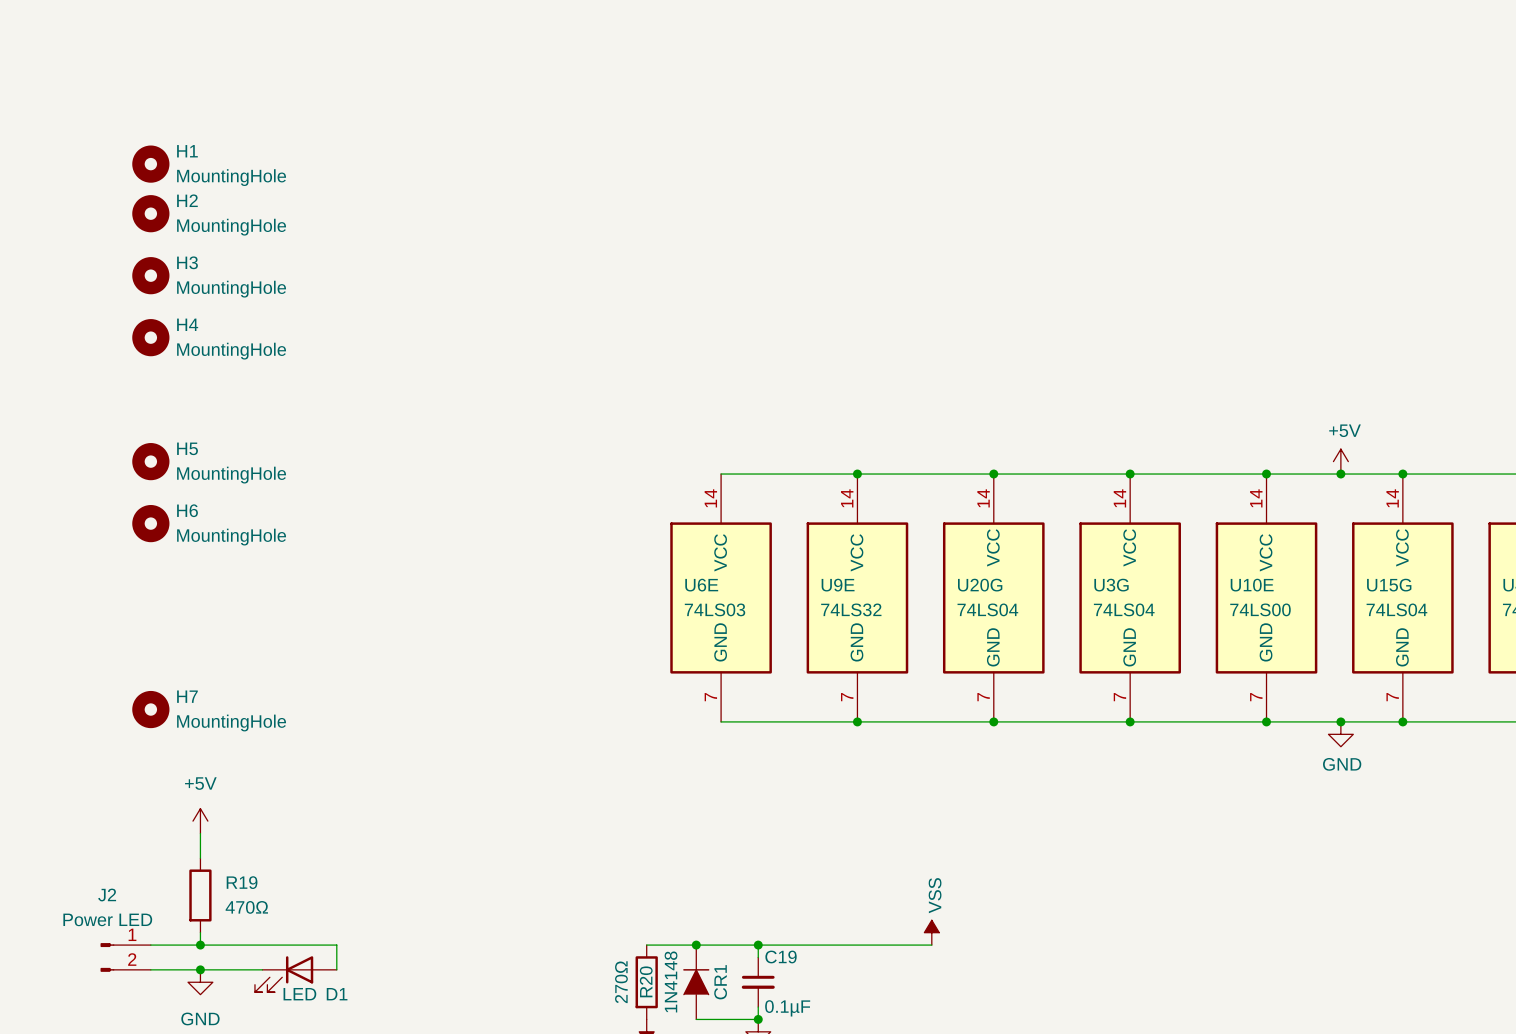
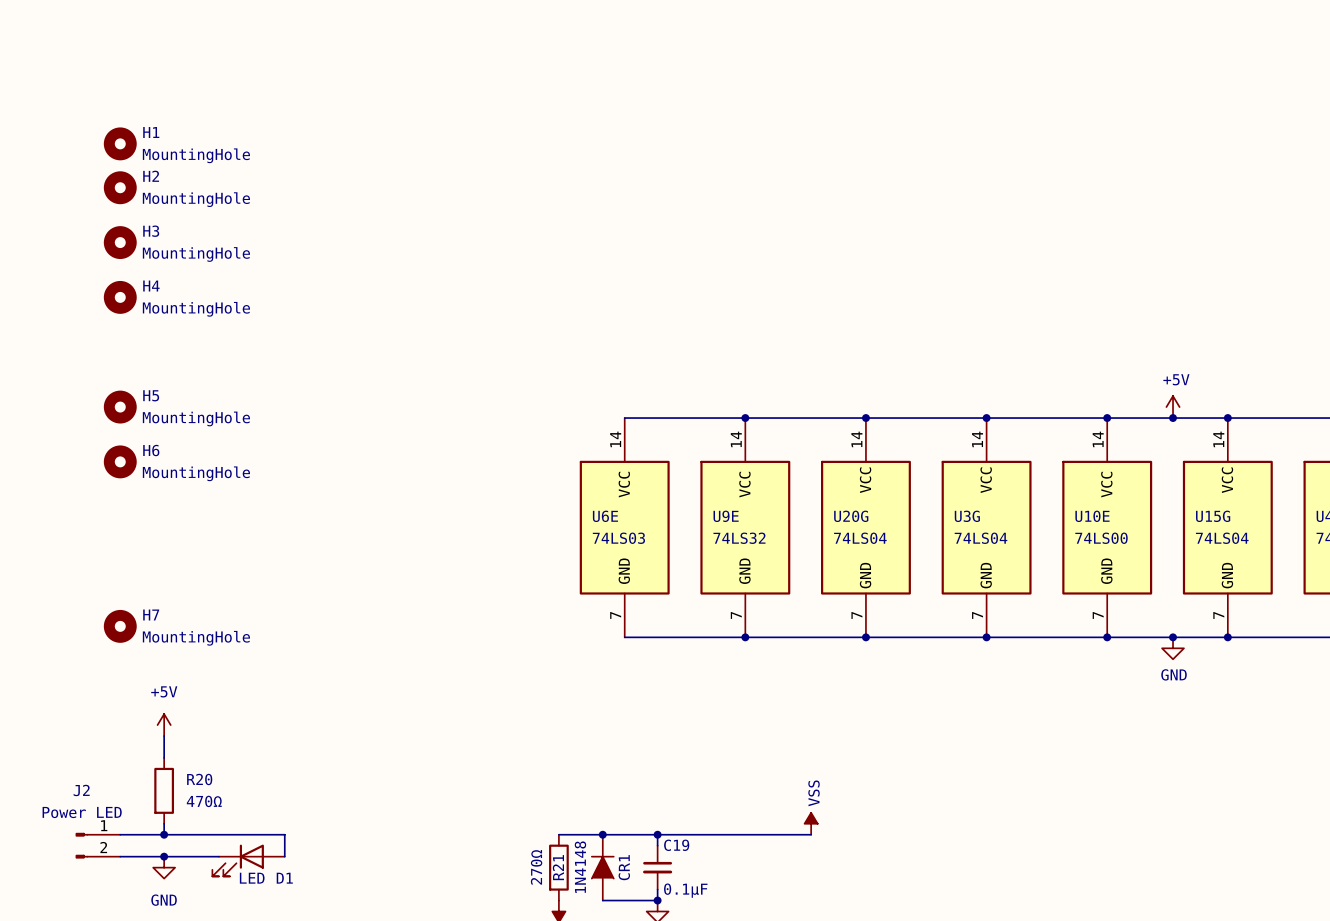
R19 name: R19 (242, 882) -> R20 (199, 779)
R20 name: R20 (646, 981) -> R21 (558, 867)

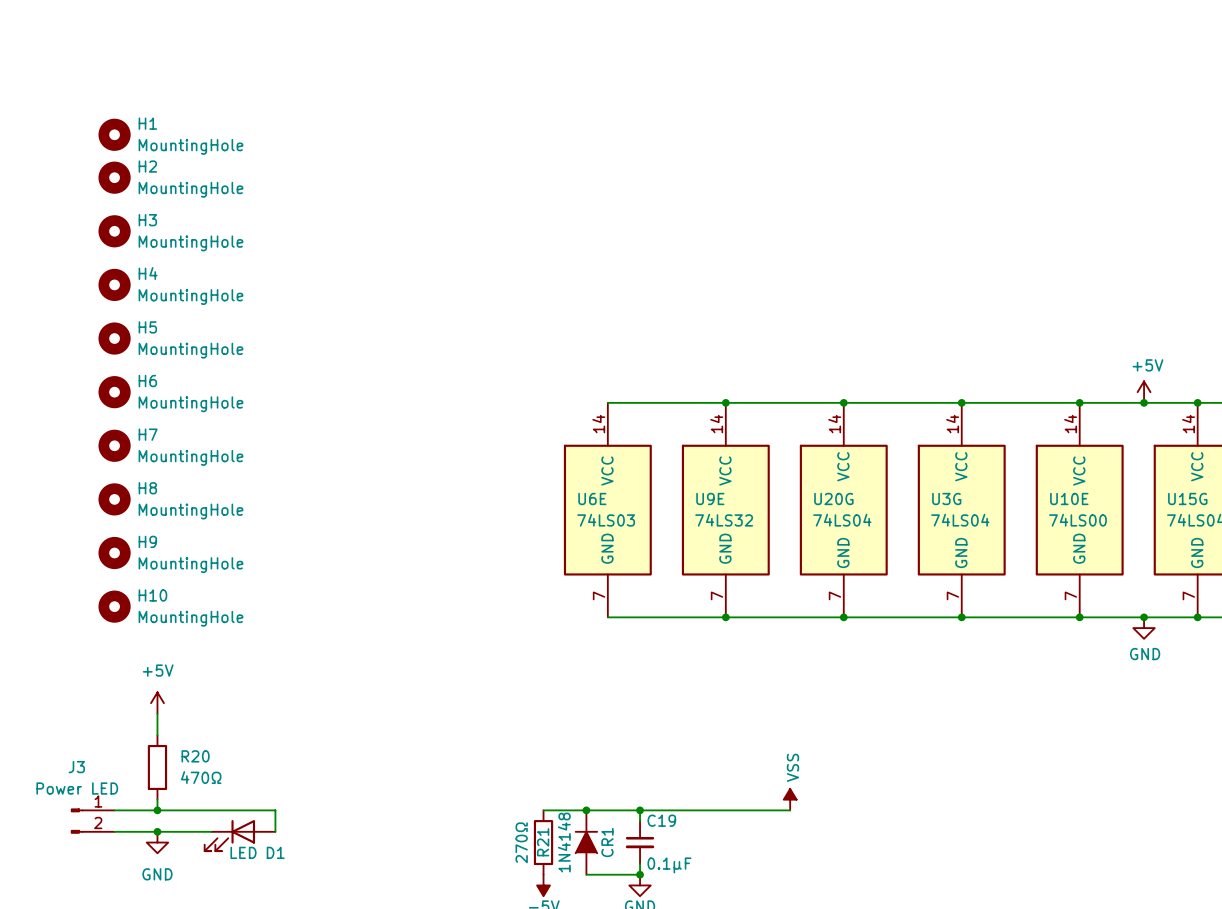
H5: none -> MountingHole (114, 338)
H5 name: H5 (151, 395) -> H6 (147, 381)
H6 name: H6 (151, 450) -> H7 (148, 434)
H8: none -> MountingHole (114, 499)
H9: none -> MountingHole (114, 553)
H7 name: H7 (151, 615) -> H10 (152, 595)
J2 name: J2 (81, 790) -> J3 (76, 767)

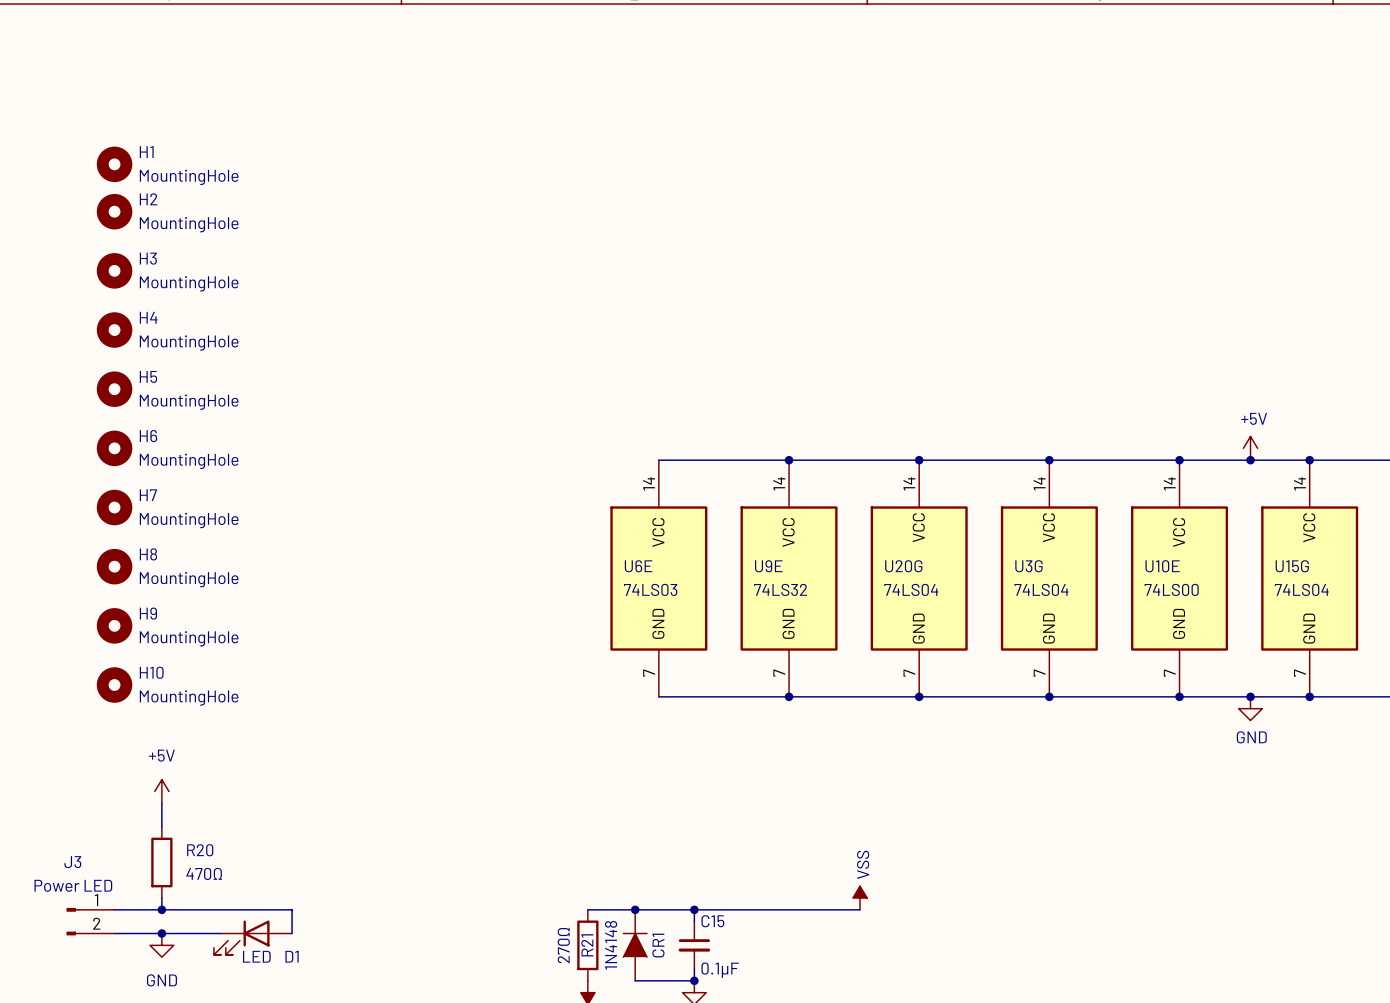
C19 name: C19 (661, 820) -> C15 (712, 921)

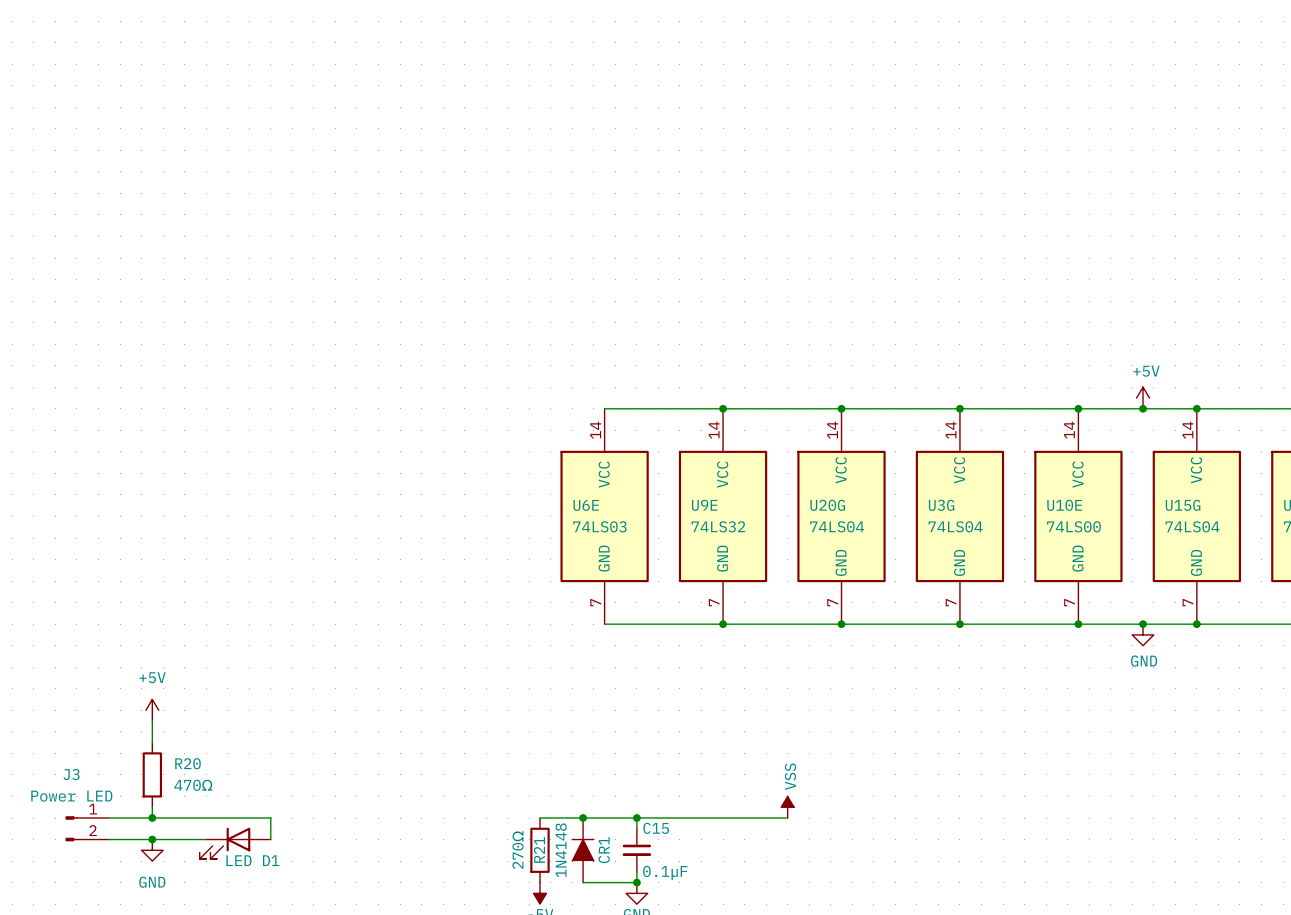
H1: MountingHole (114, 164) -> none
H2: MountingHole (114, 211) -> none
H3: MountingHole (114, 270) -> none
H4: MountingHole (114, 330) -> none
H5: MountingHole (114, 389) -> none
H6: MountingHole (114, 448) -> none
H7: MountingHole (114, 507) -> none
H8: MountingHole (114, 566) -> none
H9: MountingHole (114, 625) -> none
H10: MountingHole (114, 685) -> none

